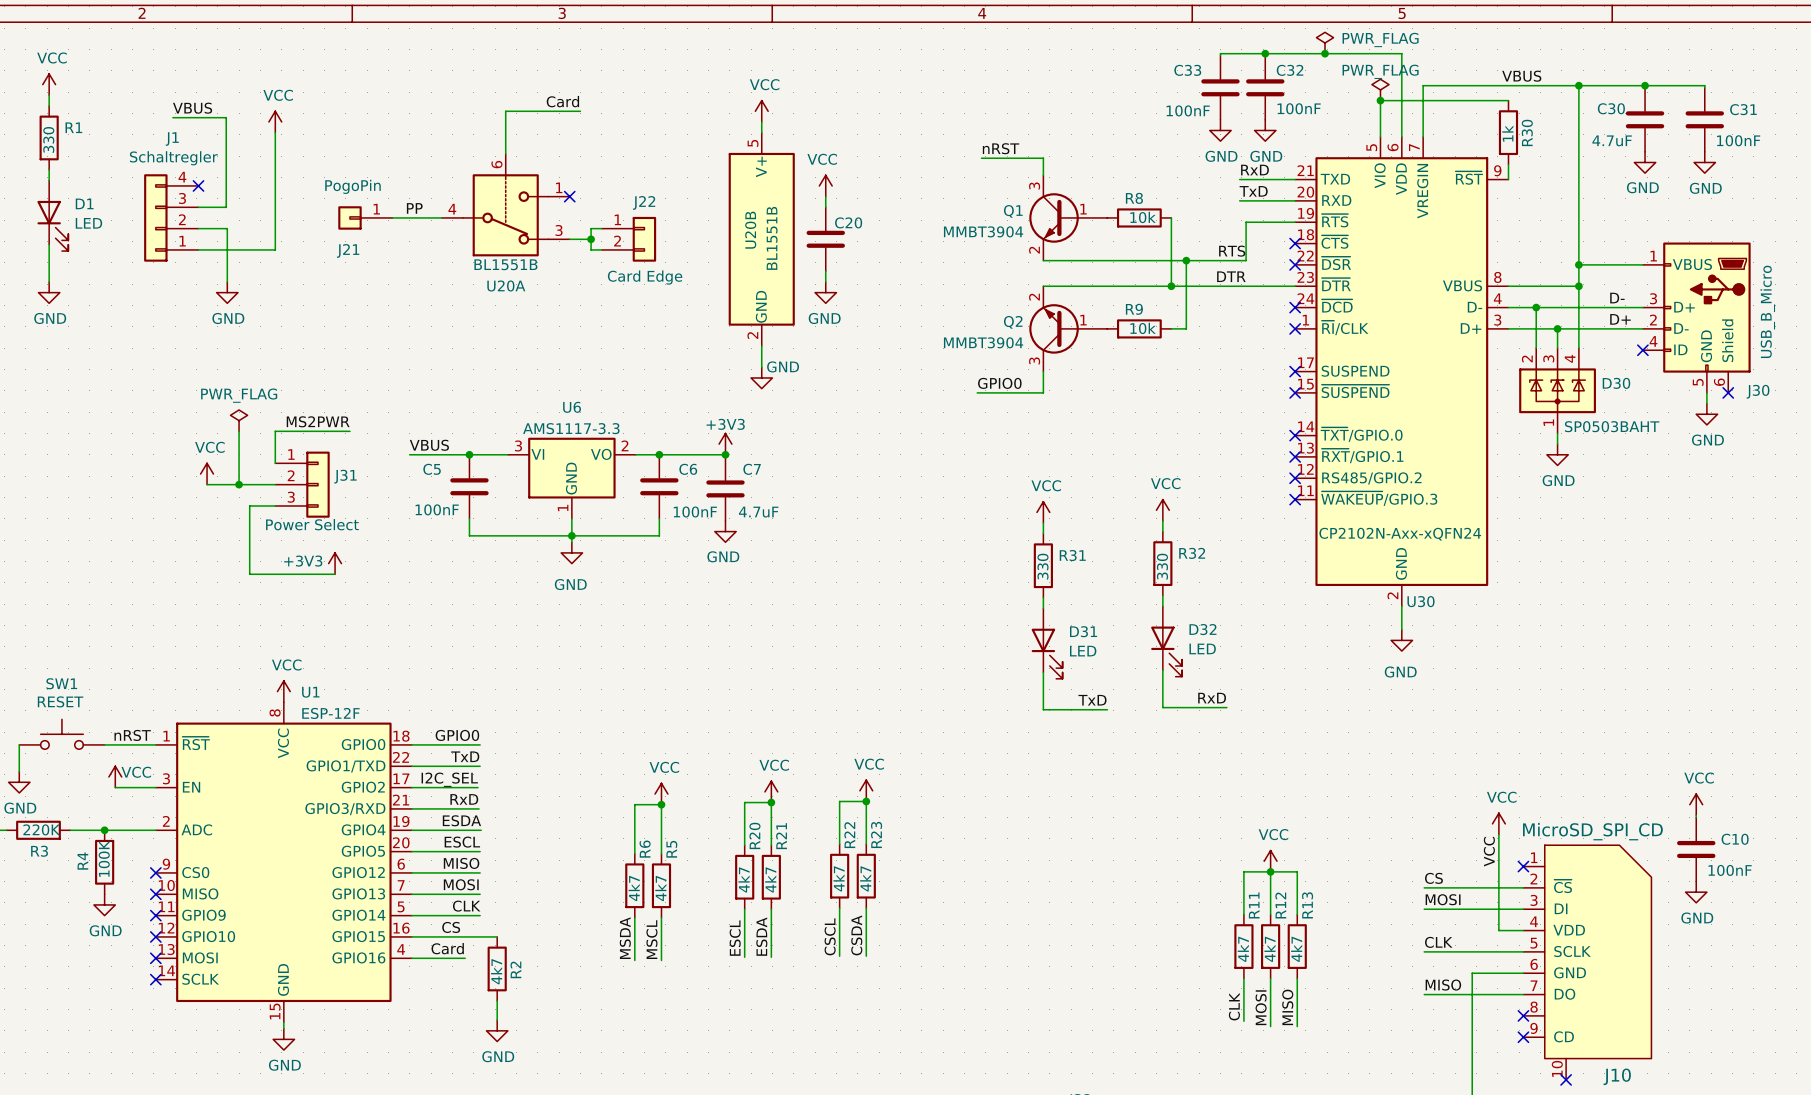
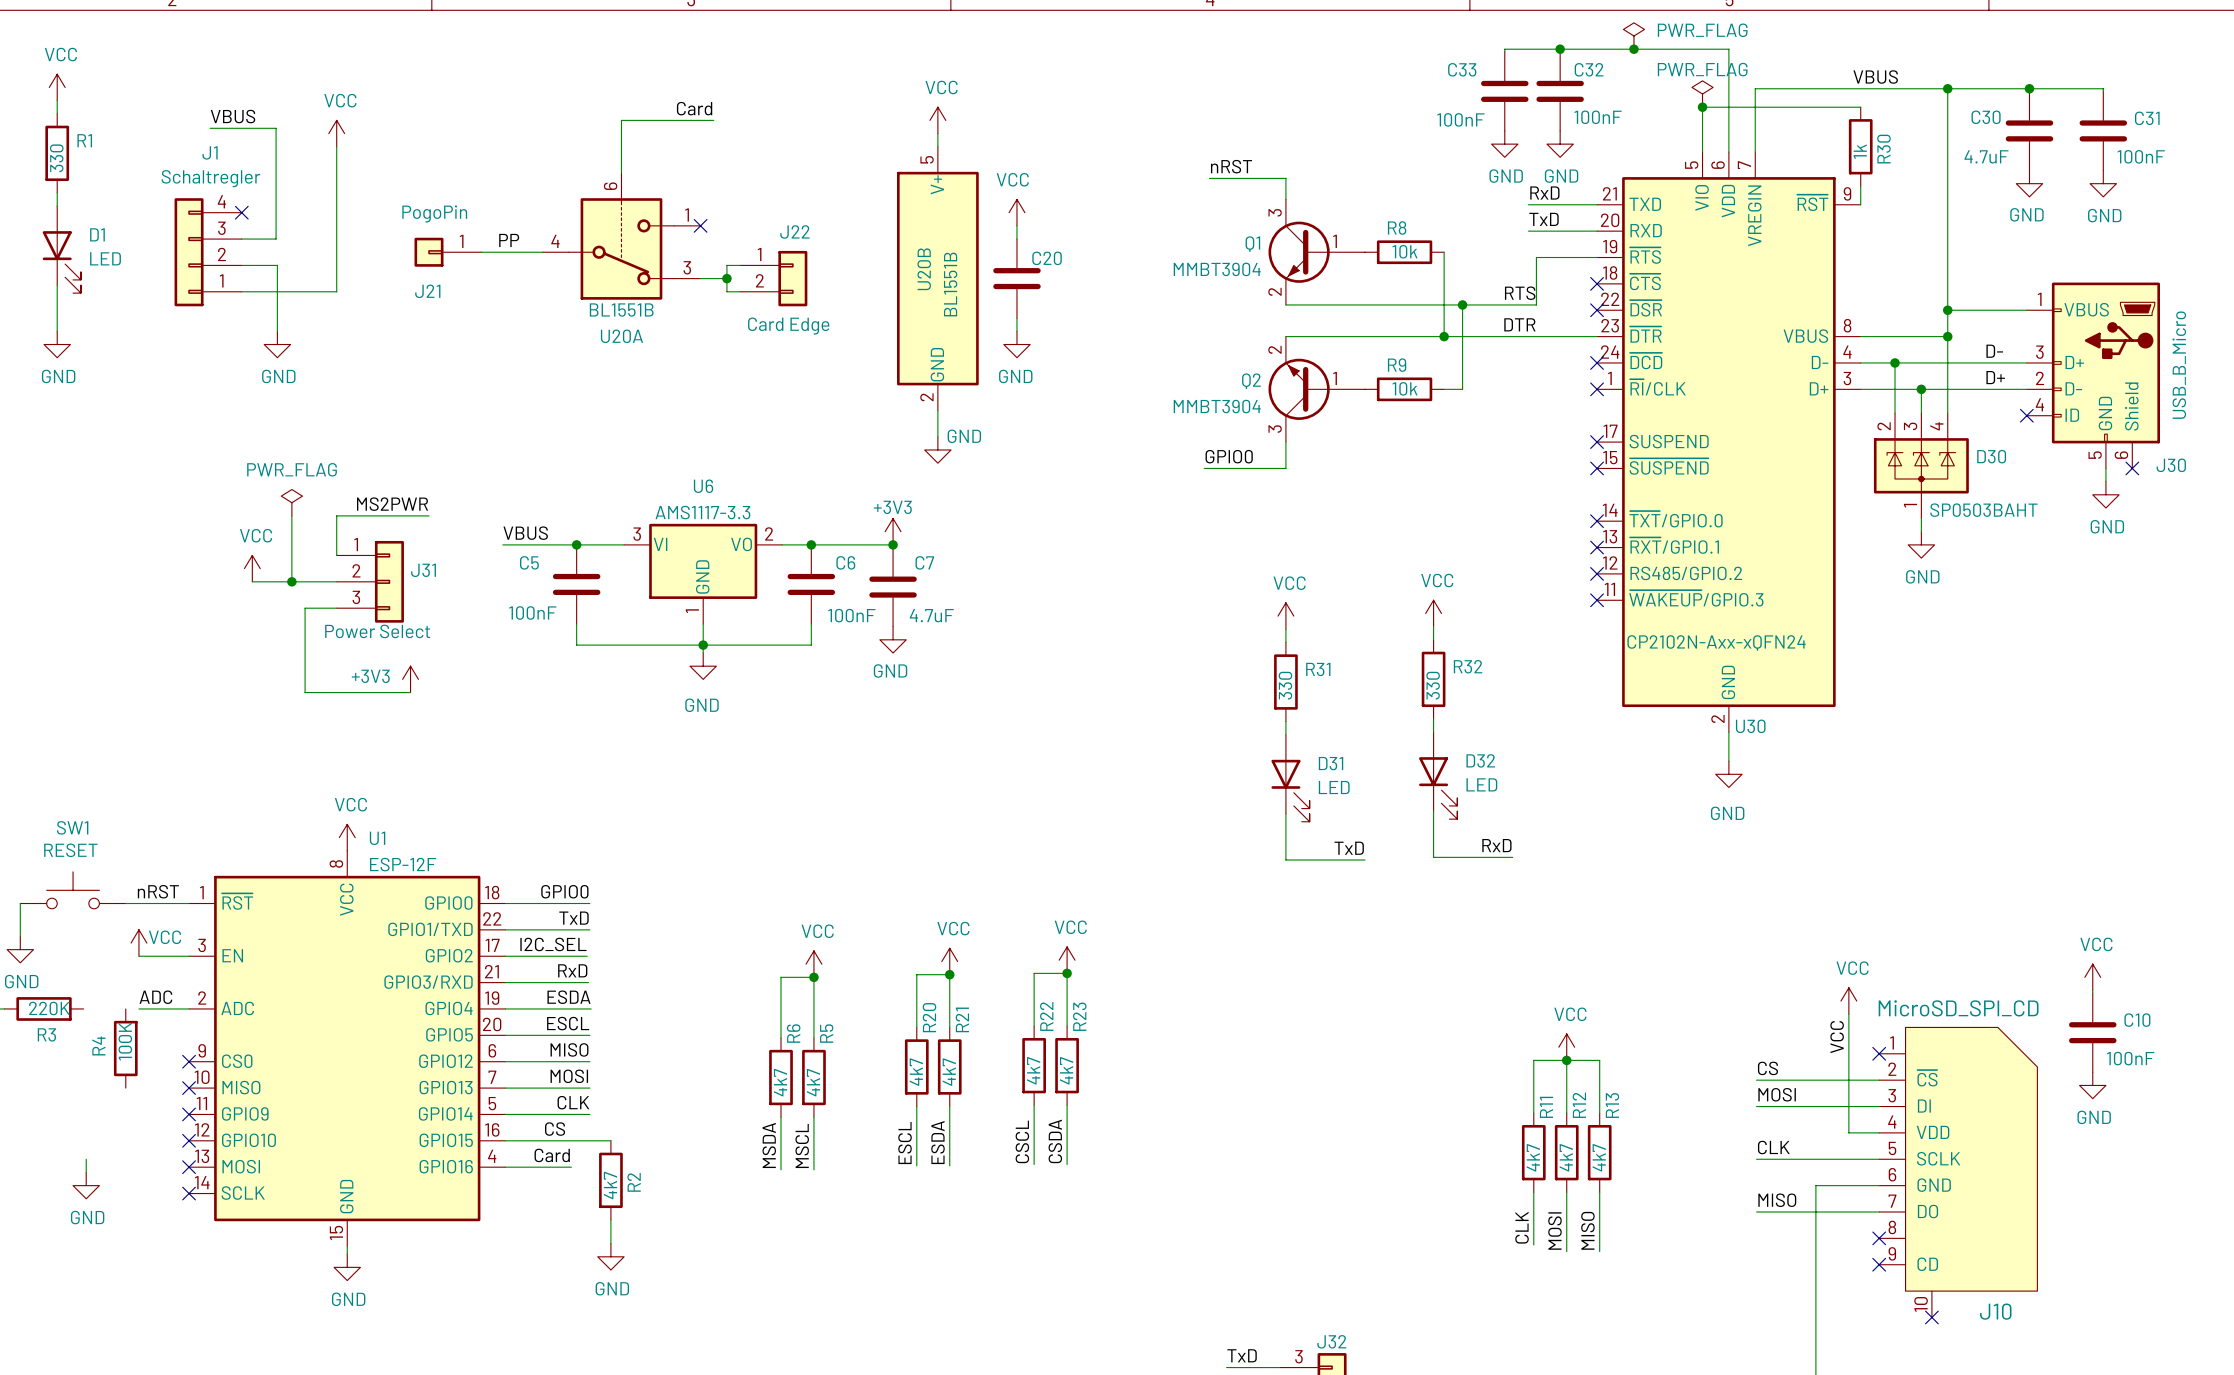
label: none -> ADC (155, 997)
wire: (70, 830) (115, 830) -> none
junction: (104, 830) -> none
power symbol position: GND (104, 904) -> GND (86, 1185)
wire: none -> (86, 1159) (86, 1172)

